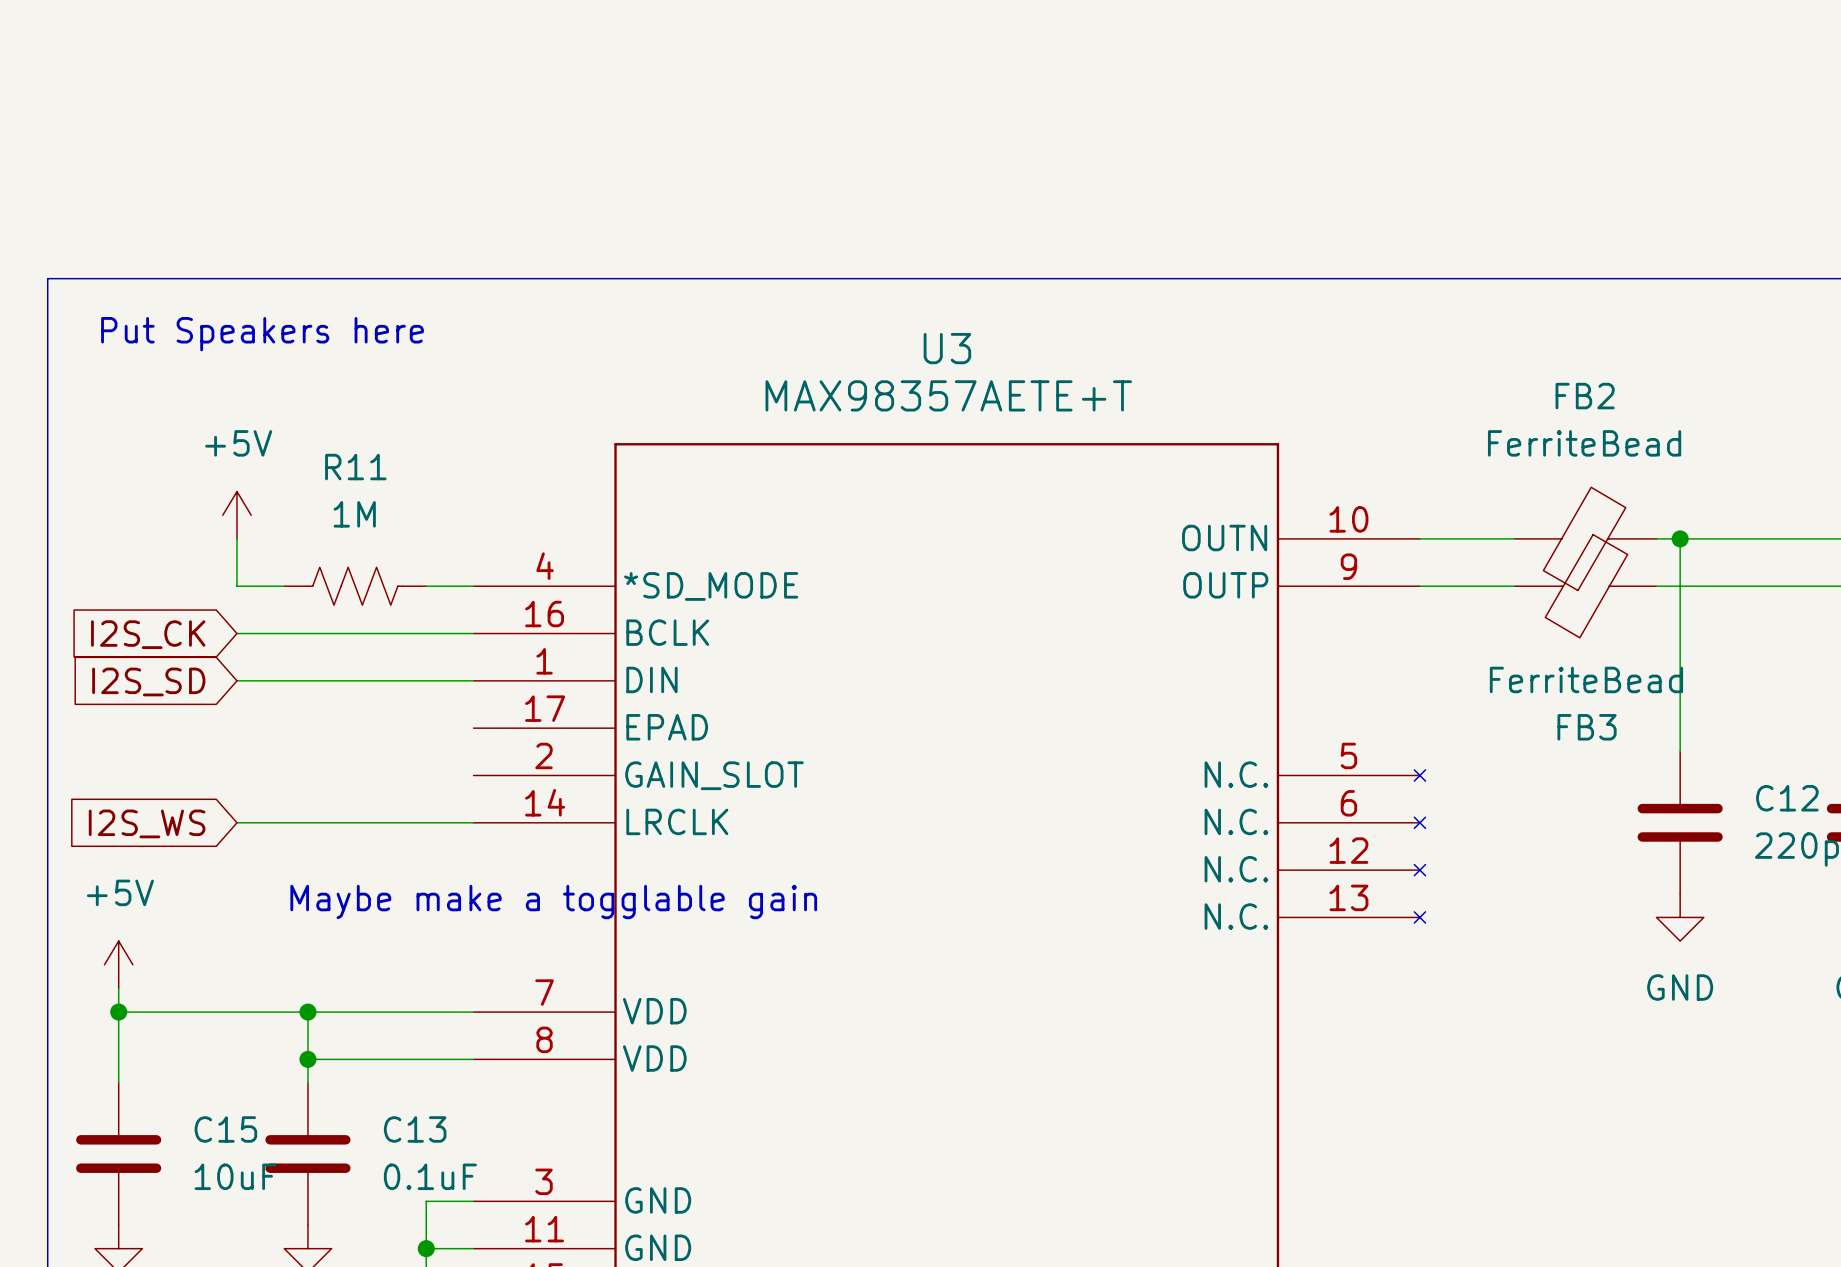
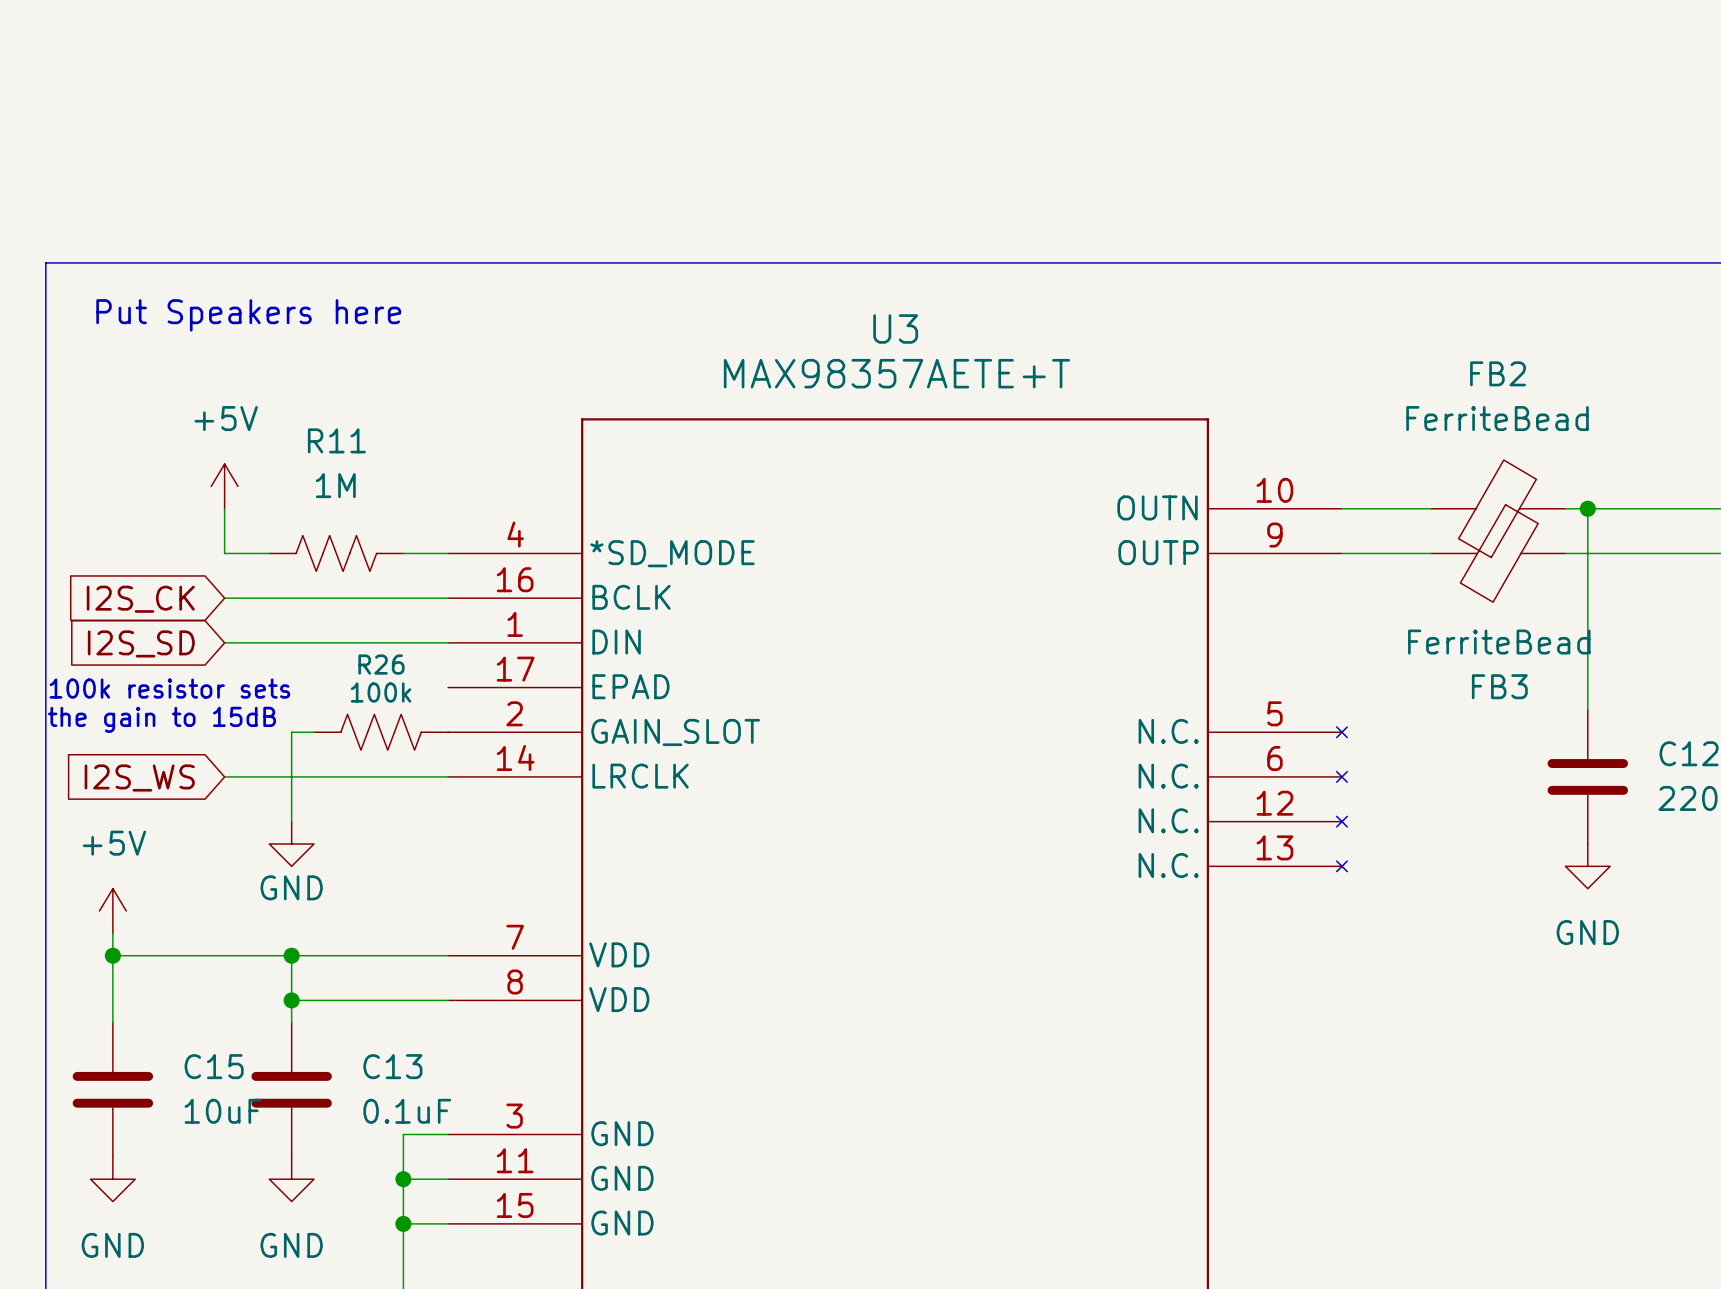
text: none -> 100k resistor sets (169, 688)
text: none -> the gain to 15dB (161, 719)
wire: none -> (314, 732) (291, 732) (291, 821)
R26: none -> 100k (381, 732)
power symbol: none -> GND (291, 843)
text: Maybe make a togglable gain (553, 902) -> none

